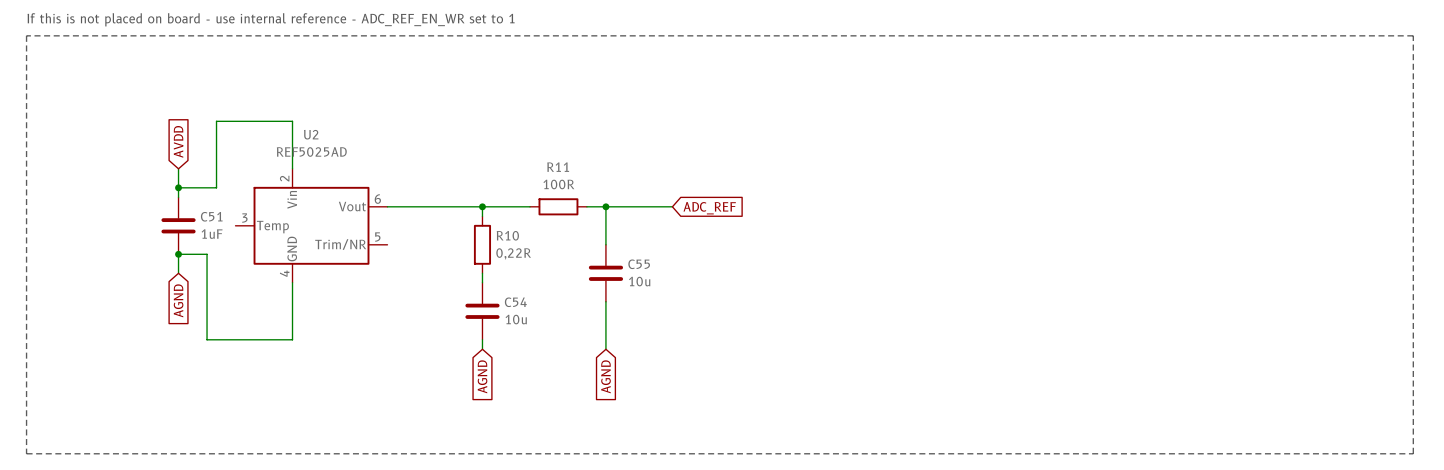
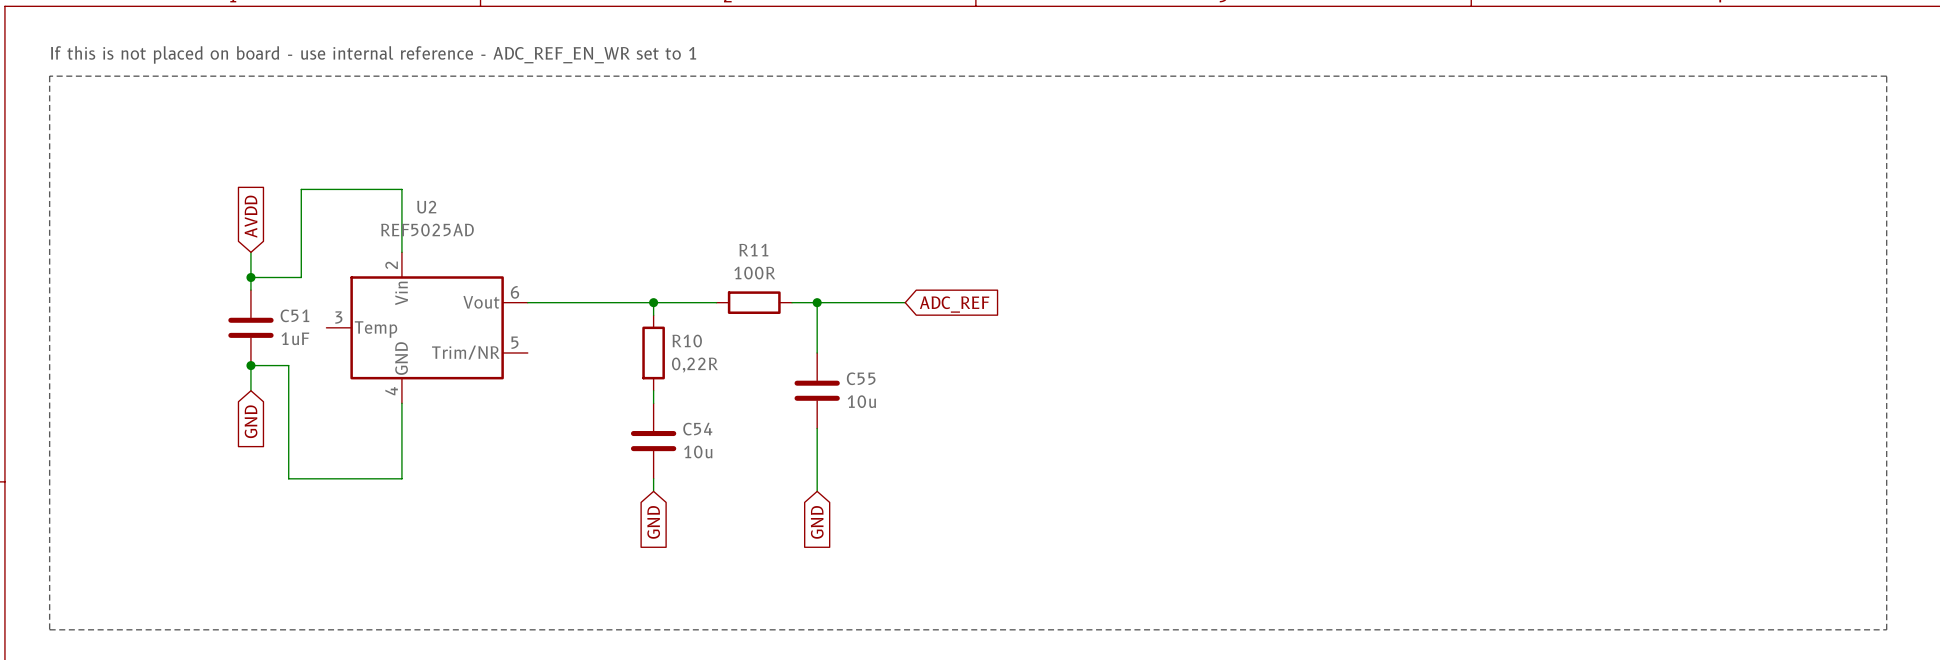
global label: AGND (178, 300) -> GND (251, 421)
global label: AGND (482, 376) -> GND (653, 522)
global label: AGND (606, 376) -> GND (817, 522)

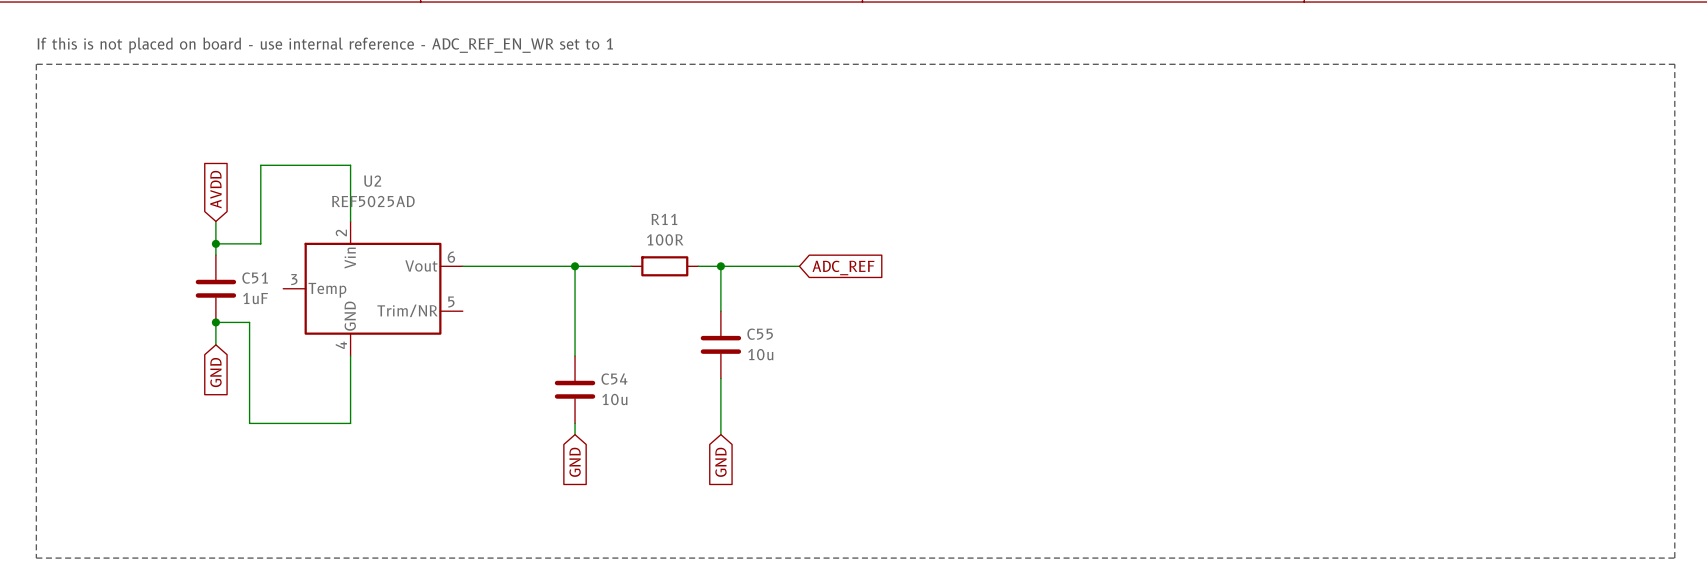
wire: none -> (575, 277) (575, 344)
R10: 0,22R (653, 352) -> none

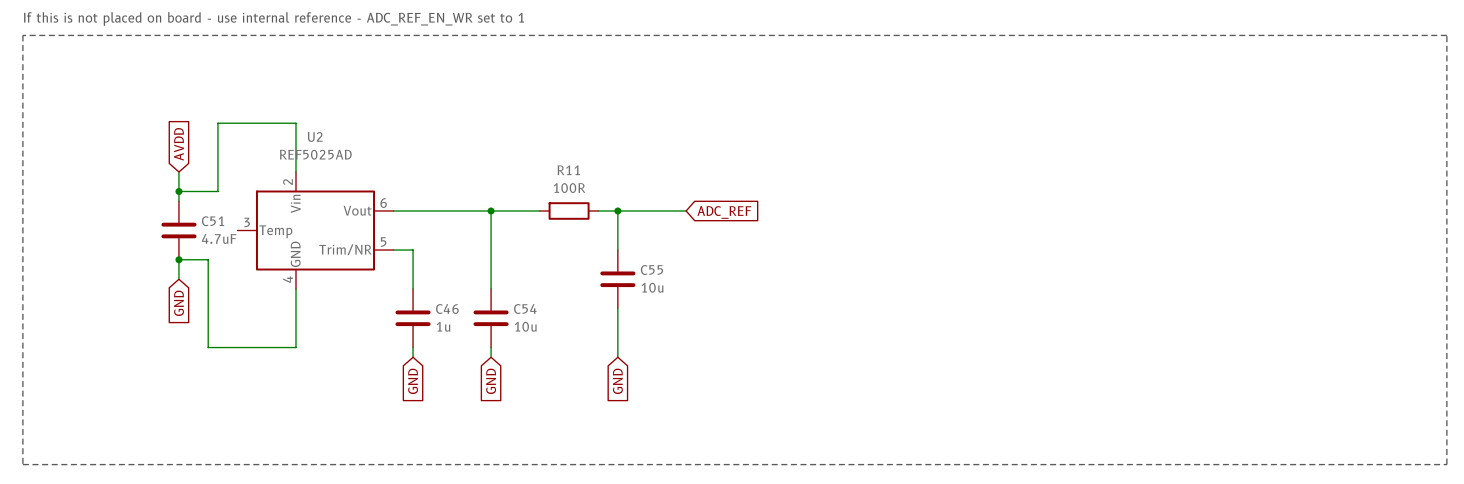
C51 value: 1uF (255, 298) -> 4.7uF (219, 238)
wire: none -> (393, 250) (413, 250) (413, 289)
C46: none -> 1u (413, 318)
wire: none -> (413, 347) (413, 357)
global label: none -> GND (413, 381)

